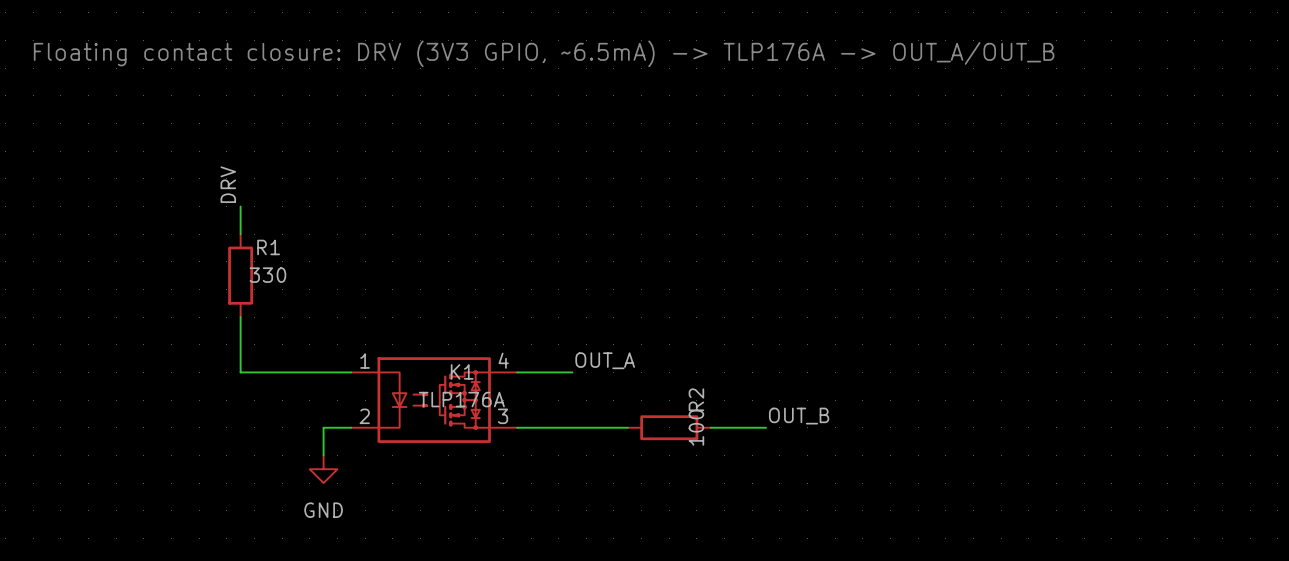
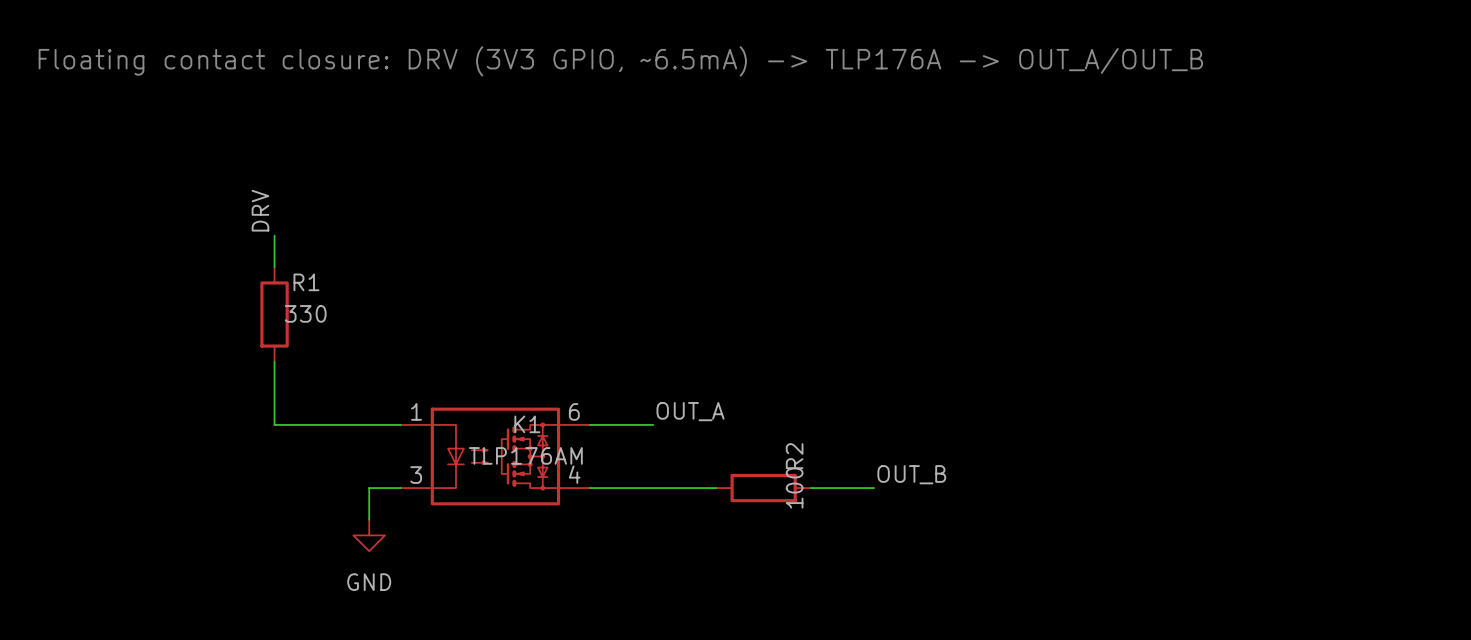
K1 pin number: 4 (503, 360) -> 6 (574, 411)
K1 value: TLP176A (461, 399) -> TLP176AM (525, 455)
K1 pin number: 2 (364, 416) -> 3 (416, 475)
K1 pin number: 3 (503, 416) -> 4 (574, 474)

